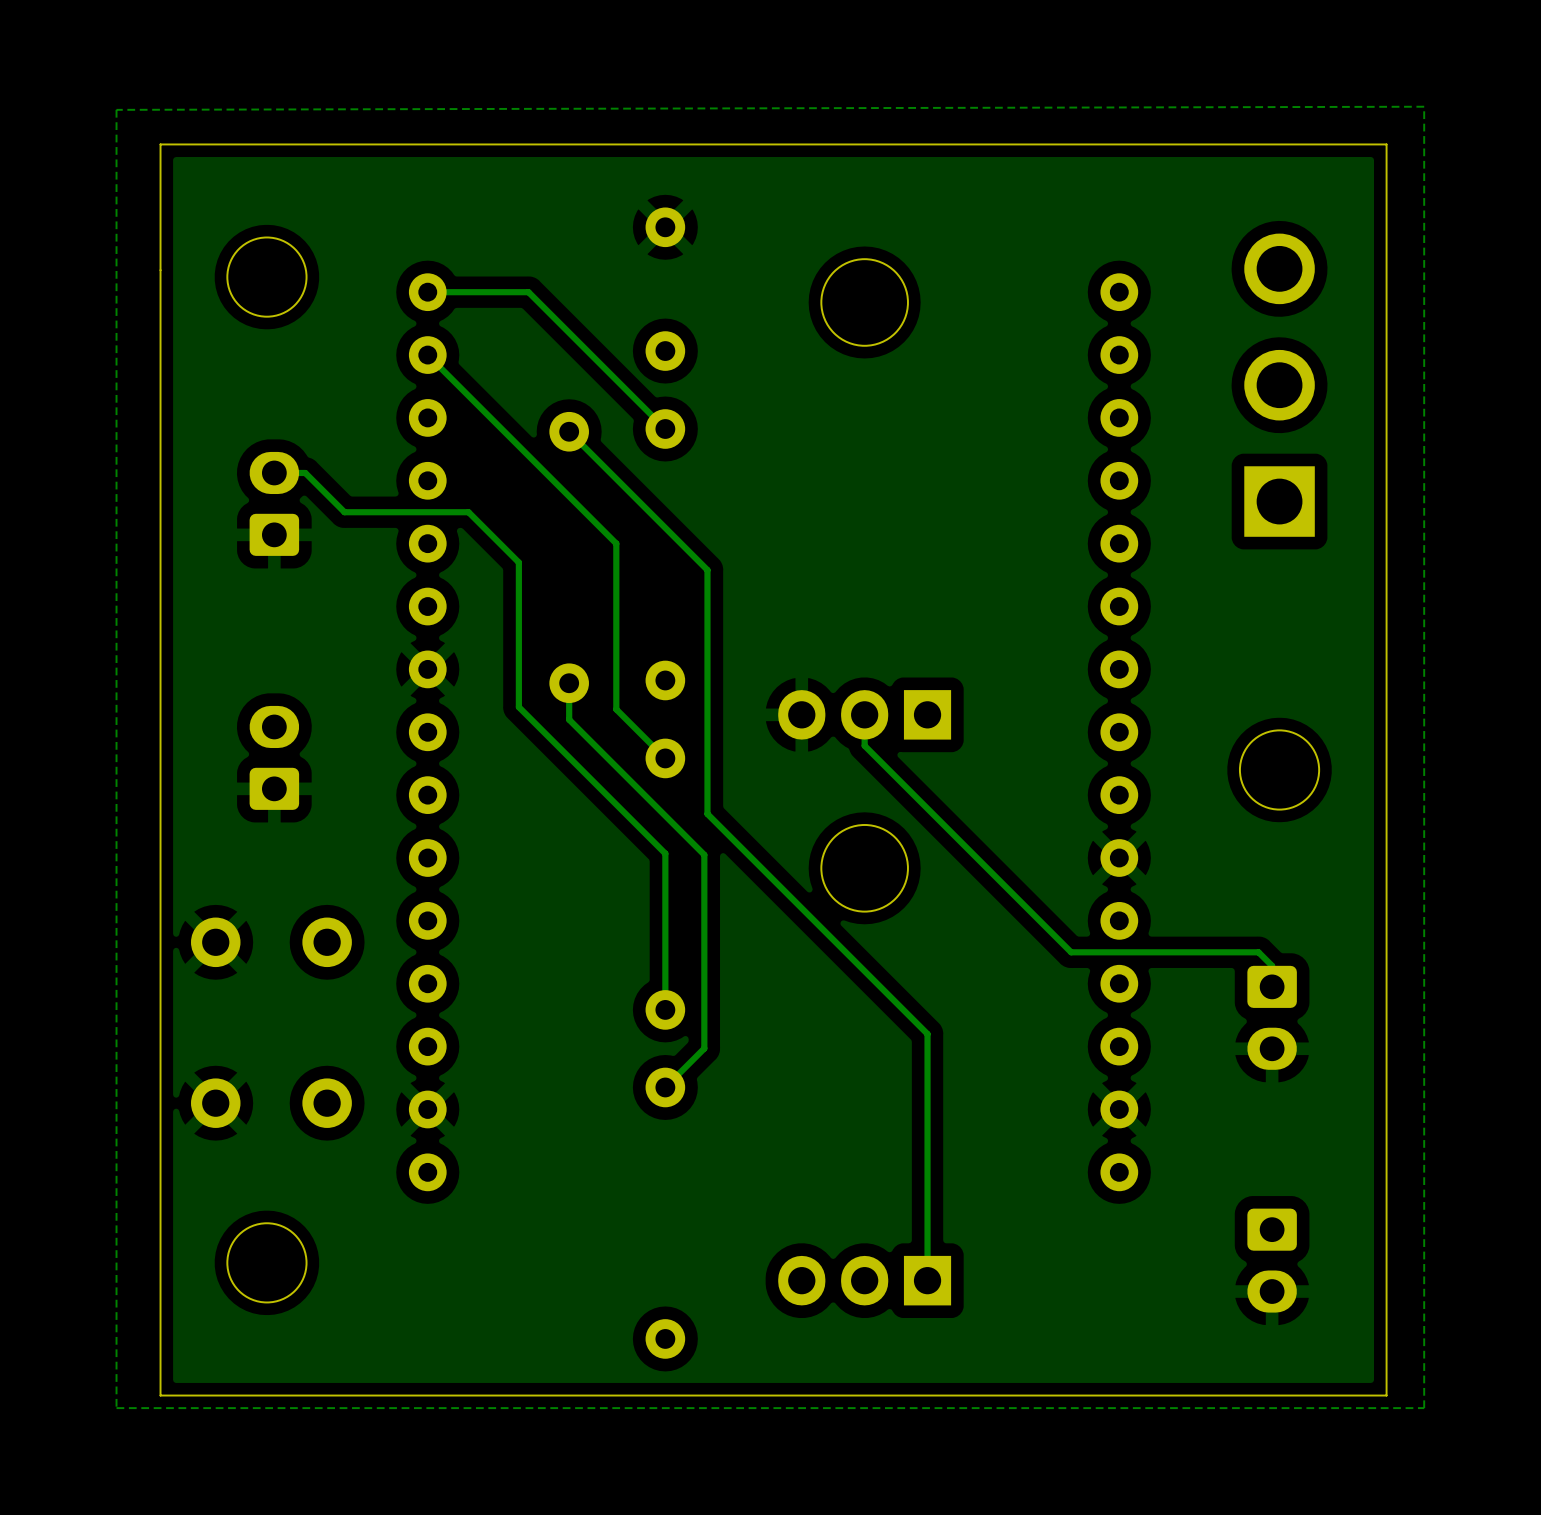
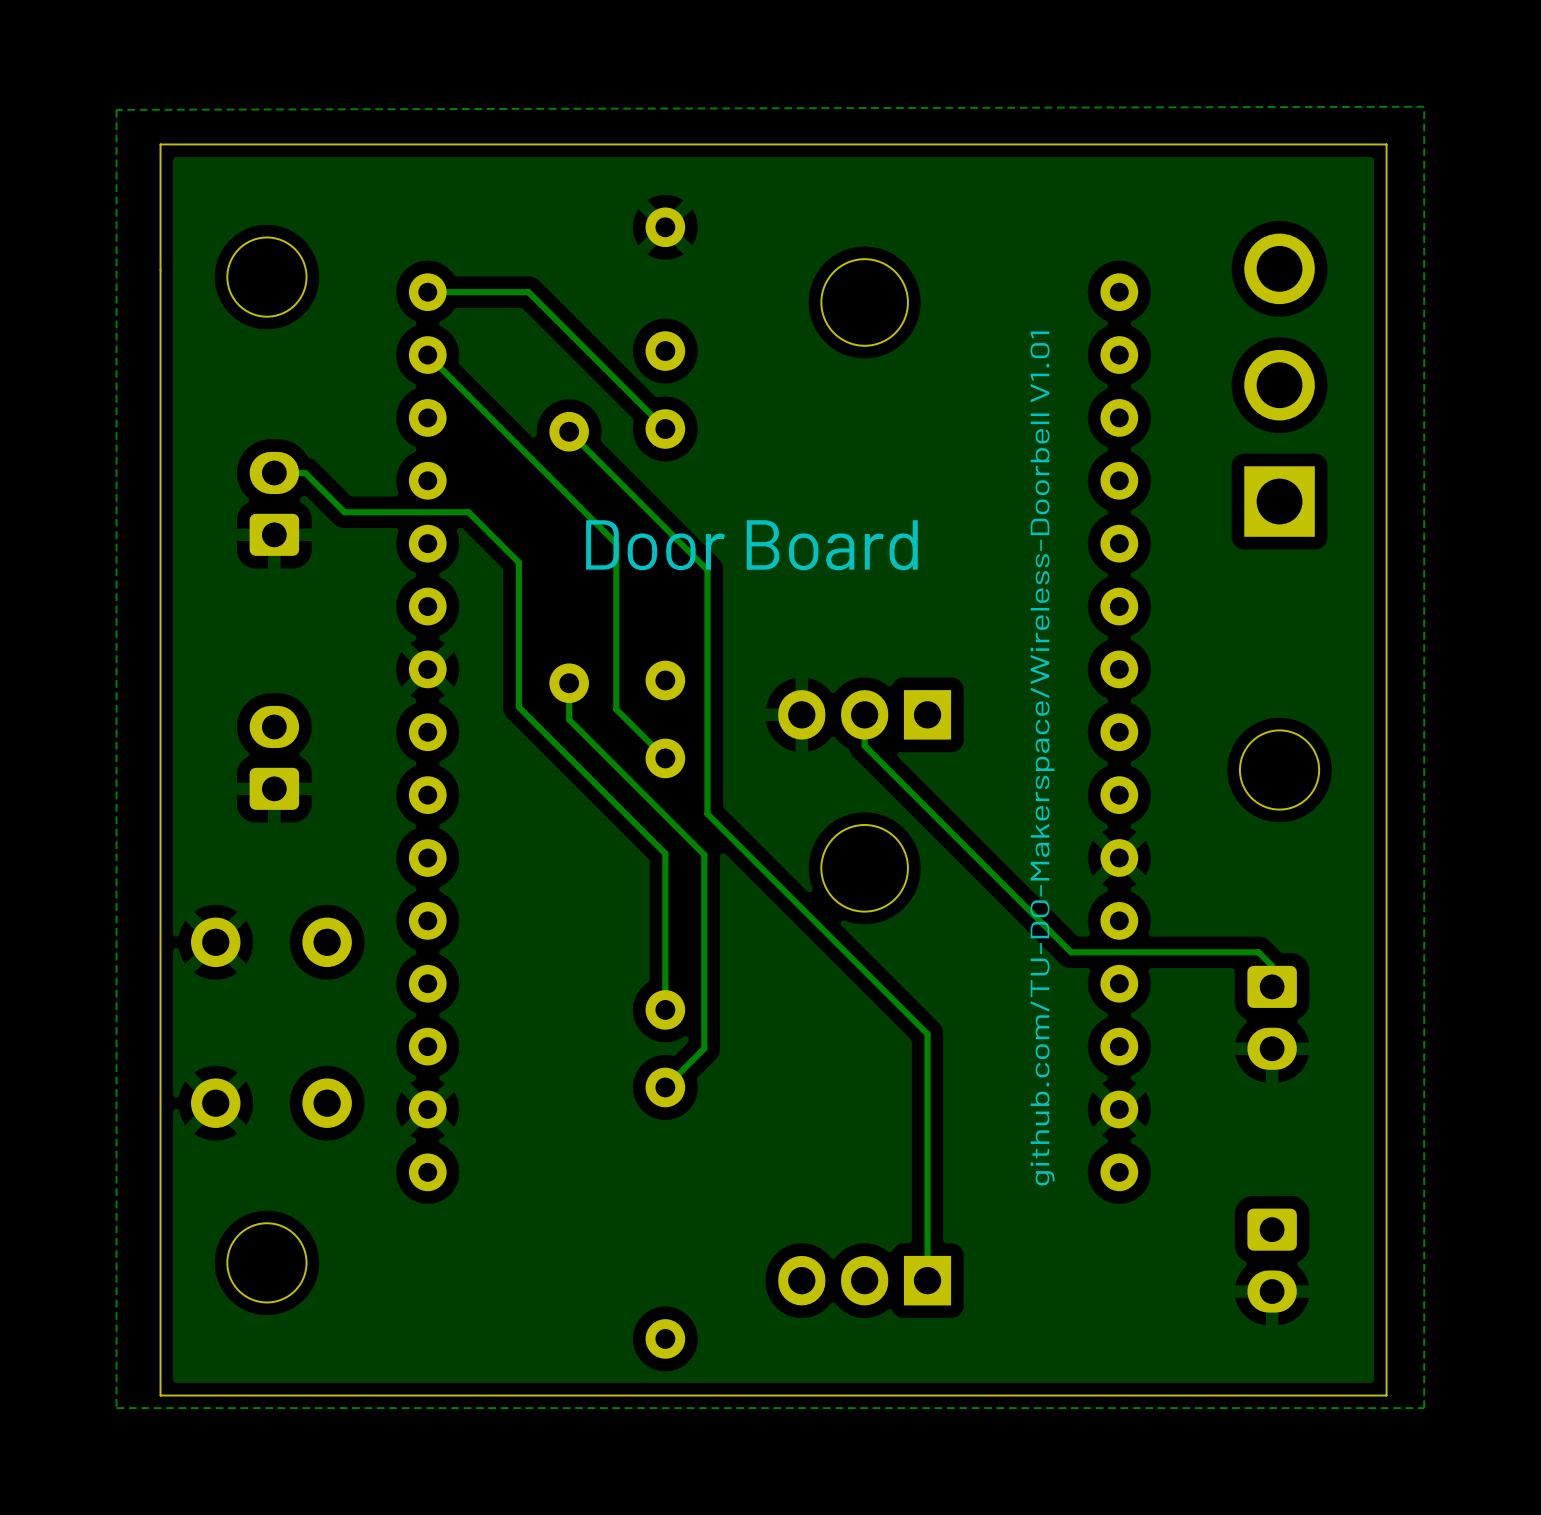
text: none -> Door Board (751, 545)
text: none -> github.com/TU-DO-Makerspace/Wireless-Doorbell V1.01 (1042, 758)

